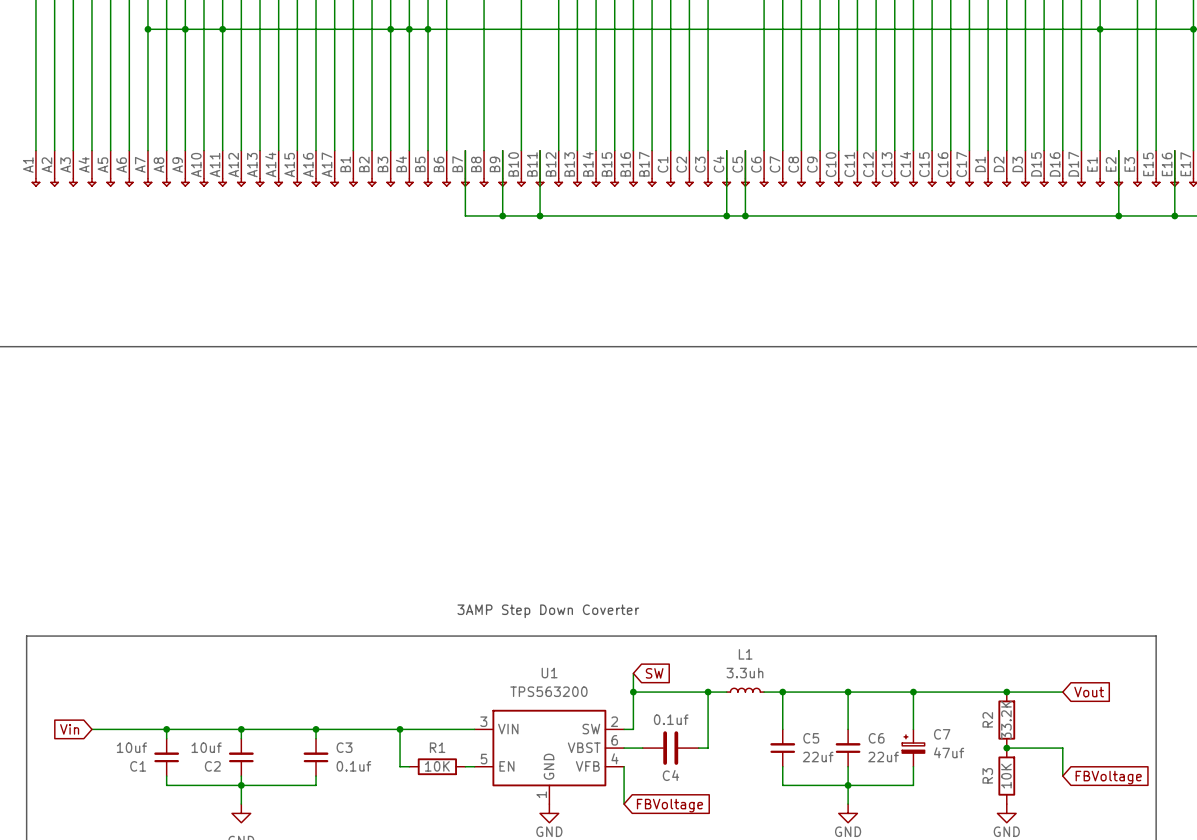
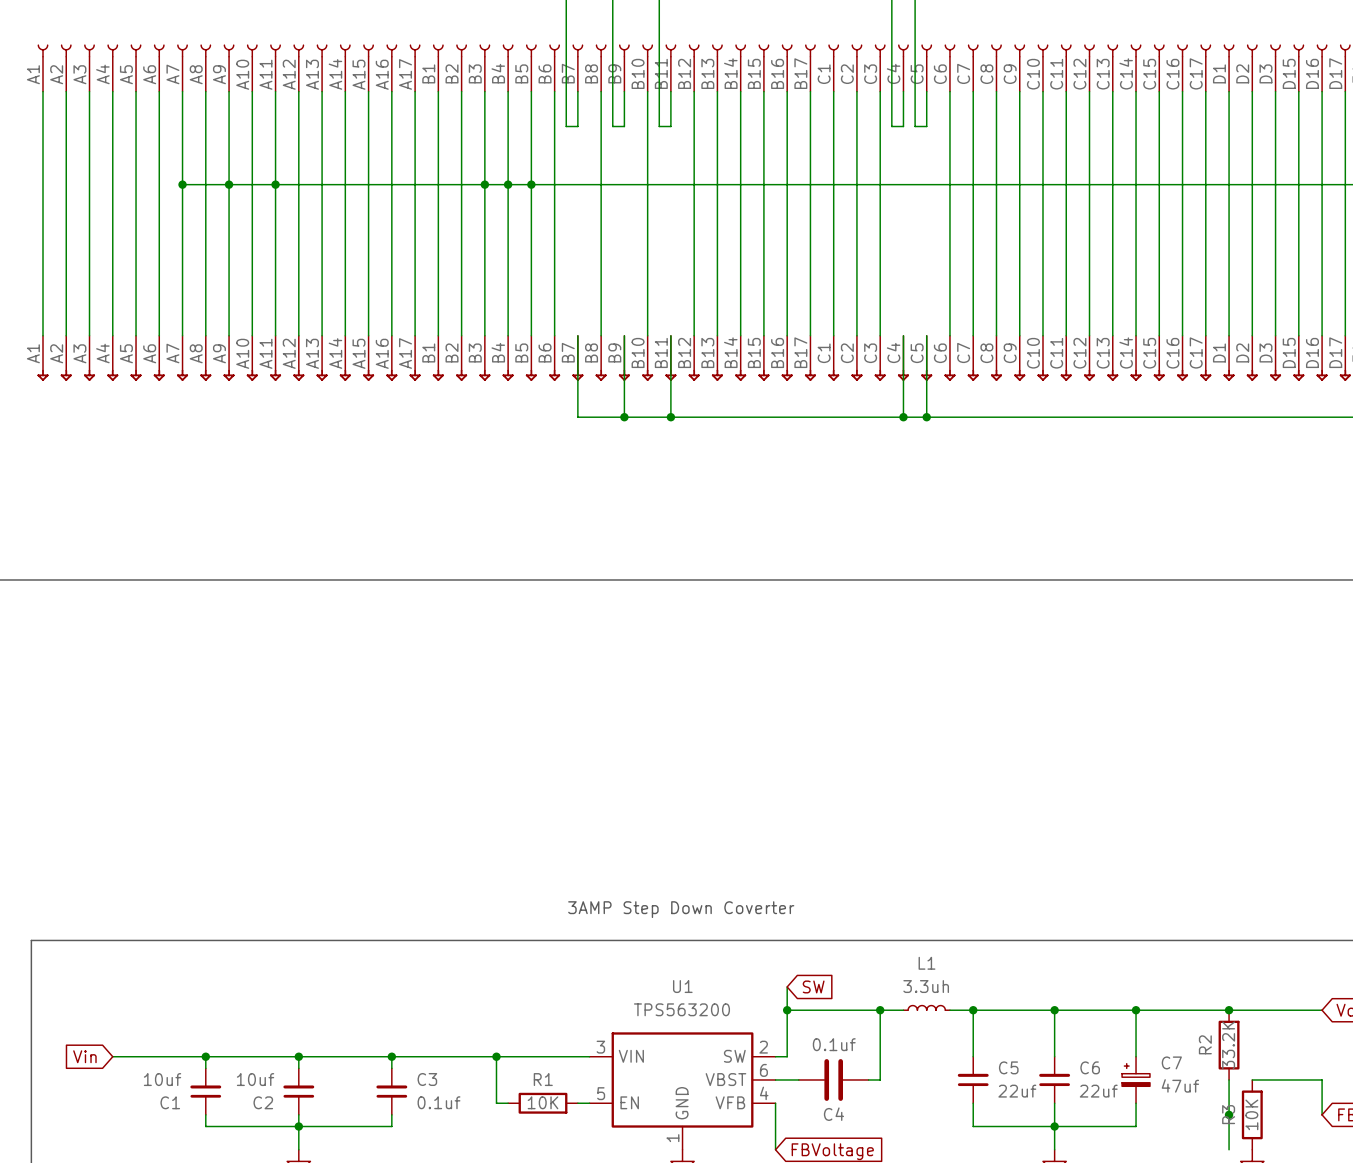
junction position: (1006, 692) -> (1229, 1010)
R2 position: (1006, 720) -> (1229, 1045)
wire: none -> (1229, 1079) (1229, 1149)
junction: (1006, 748) -> none
junction: none -> (1229, 1114)

